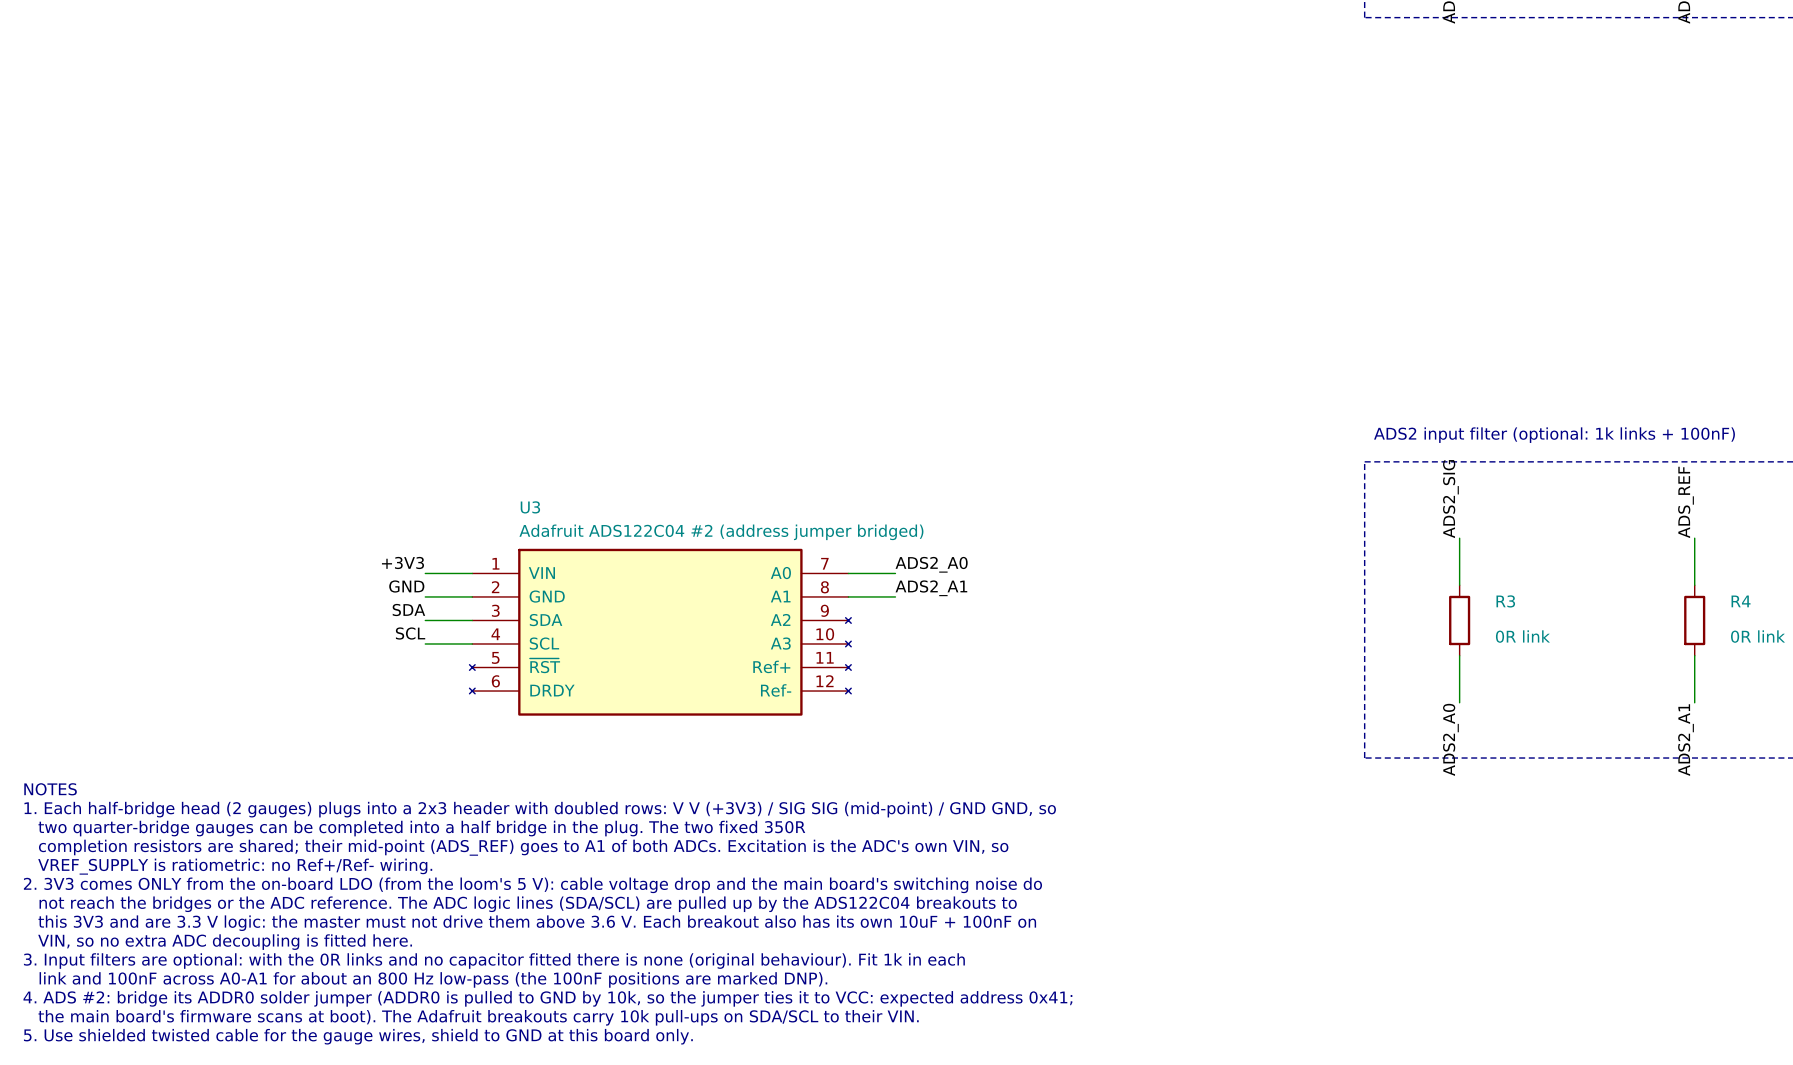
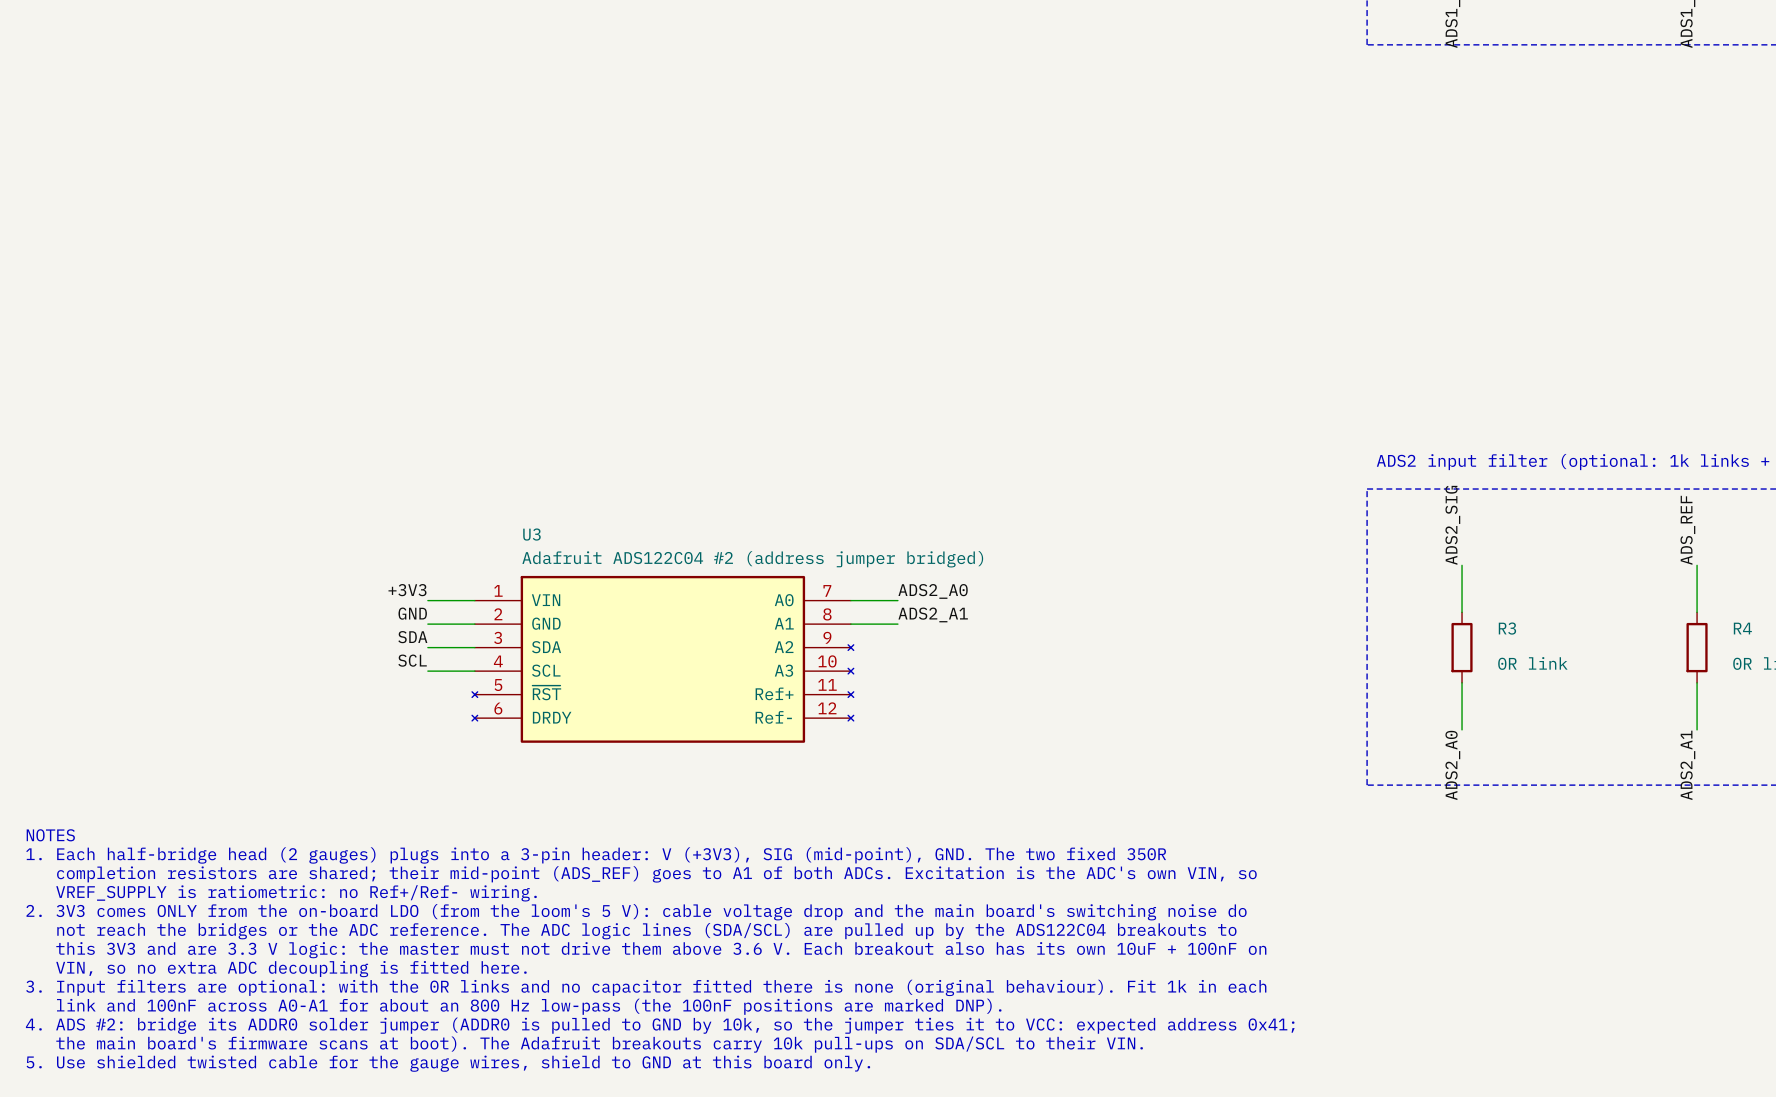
text: NOTES (50, 789) -> none
text: 1. Each half-bridge head (2 gauges) plugs into a 2x3 header with doubled rows: V V (+3V3) / SIG SIG (mid-point) / GND GND, so (540, 809) -> NOTES (50, 835)
text: two quarter-bridge gauges can be completed into a half bridge in the plug. The two fixed 350R (421, 828) -> 1. Each half-bridge head (2 gauges) plugs into a 3-pin header: V (+3V3), SIG (mid-point), GND. The two fixed 350R (596, 855)

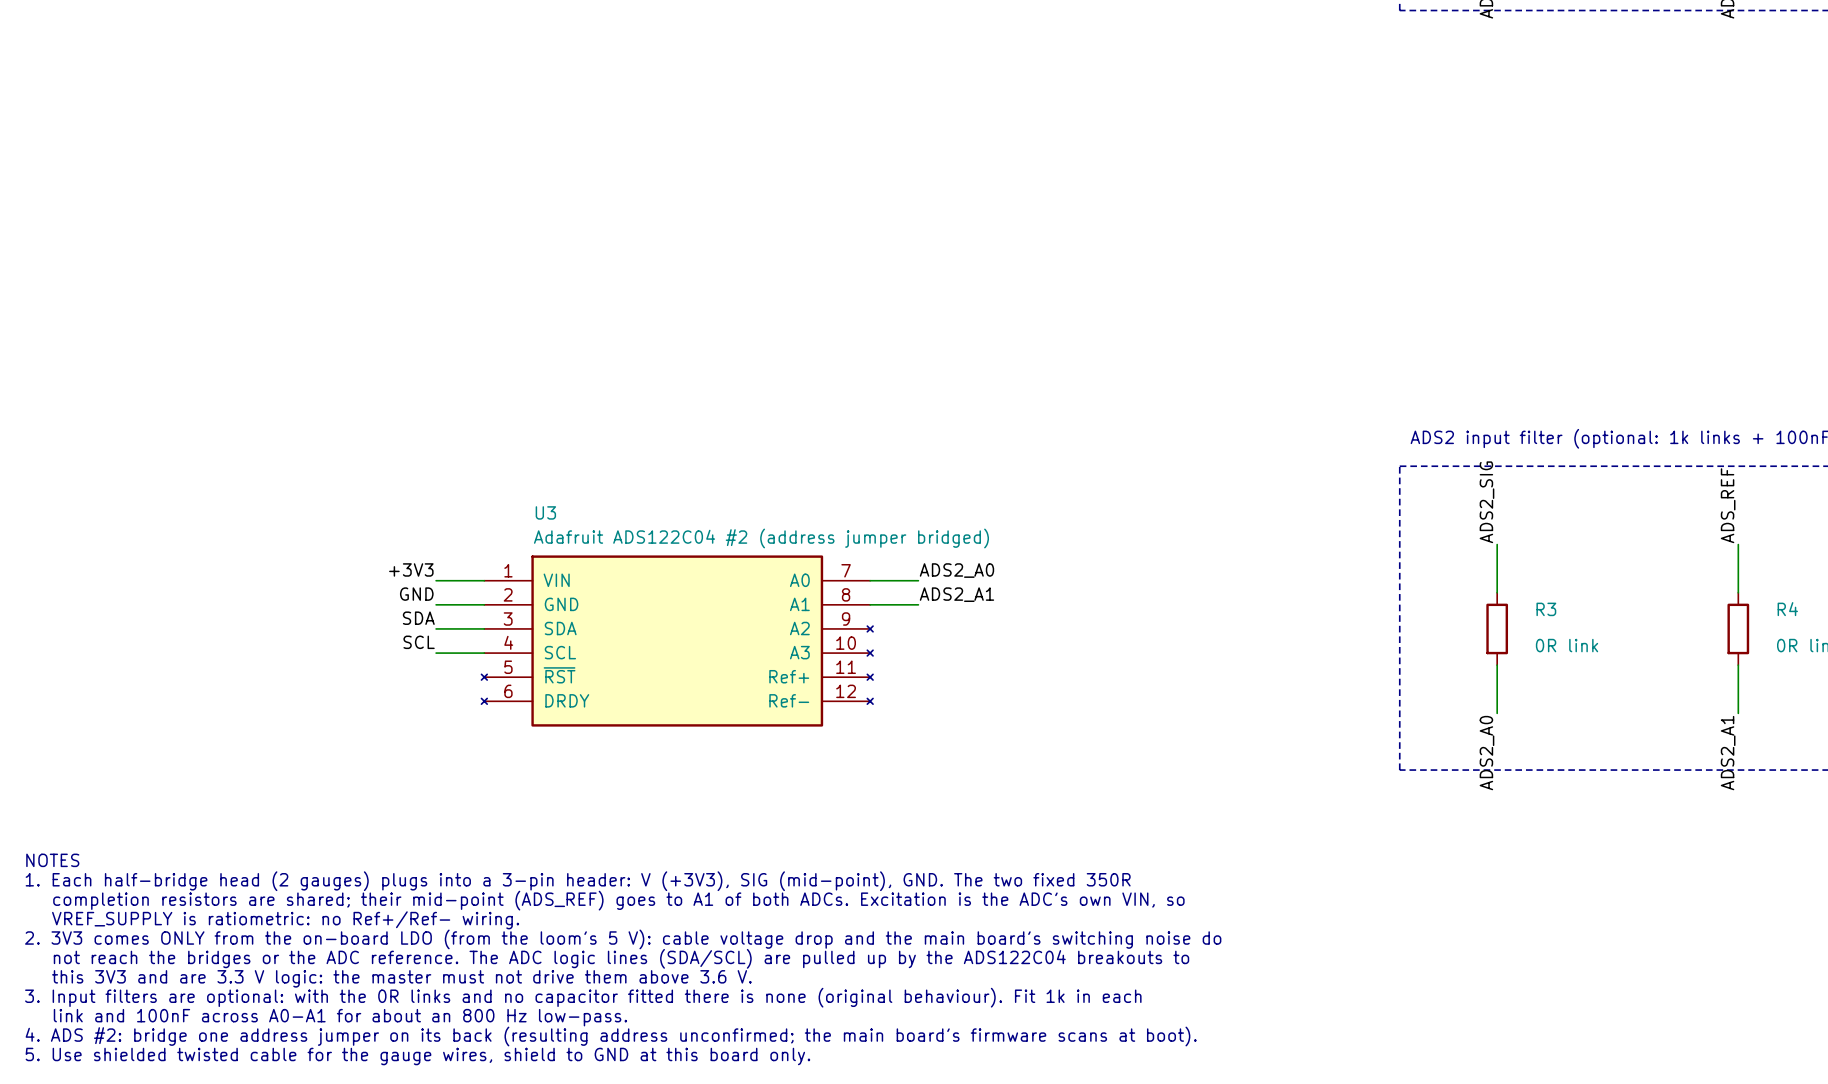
text: NOTES (50, 835) -> none
text: 1. Each half-bridge head (2 gauges) plugs into a 3-pin header: V (+3V3), SIG (mid-point), GND. The two fixed 350R (596, 855) -> none
text: completion resistors are shared; their mid-point (ADS_REF) goes to A1 of both ADCs. Excitation is the ADC's own VIN, so (656, 874) -> NOTES (52, 860)
text: VREF_SUPPLY is ratiometric: no Ref+/Ref- wiring. (296, 893) -> 1. Each half-bridge head (2 gauges) plugs into a 3-pin header: V (+3V3), SIG (mid-point), GND. The two fixed 350R (578, 881)
text: 2. 3V3 comes ONLY from the on-board LDO (from the loom's 5 V): cable voltage drop and the main board's switching noise do (636, 912) -> completion resistors are shared; their mid-point (ADS_REF) goes to A1 of both ADCs. Excitation is the ADC's own VIN, so (618, 900)
text: not reach the bridges or the ADC reference. The ADC logic lines (SDA/SCL) are pulled up by the ADS122C04 breakouts to (646, 931) -> VREF_SUPPLY is ratiometric: no Ref+/Ref- wiring. (285, 920)
text: this 3V3 and are 3.3 V logic: the master must not drive them above 3.6 V. Each breakout also has its own 10uF + 100nF on (661, 950) -> 2. 3V3 comes ONLY from the on-board LDO (from the loom's 5 V): cable voltage drop and the main board's switching noise do (623, 939)
text: VIN, so no extra ADC decoupling is fitted here. (291, 969) -> not reach the bridges or the ADC reference. The ADC logic lines (SDA/SCL) are pulled up by the ADS122C04 breakouts to (621, 958)
text: 3. Input filters are optional: with the 0R links and no capacitor fitted there is none (original behaviour). Fit 1k in each (646, 987) -> this 3V3 and are 3.3 V logic: the master must not drive them above 3.6 V. (401, 978)
text: link and 100nF across A0-A1 for about an 800 Hz low-pass (the 100nF positions are marked DNP). (529, 1006) -> 3. Input filters are optional: with the 0R links and no capacitor fitted there is none (original behaviour). Fit 1k in each (583, 997)
text: 4. ADS #2: bridge its ADDR0 solder jumper (ADDR0 is pulled to GND by 10k, so the jumper ties it to VCC: expected address 0x41; (660, 1025) -> link and 100nF across A0-A1 for about an 800 Hz low-pass. (340, 1017)
text: the main board's firmware scans at boot). The Adafruit breakouts carry 10k pull-ups on SDA/SCL to their VIN. (599, 1044) -> 4. ADS #2: bridge one address jumper on its back (resulting address unconfirmed; the main board's firmware scans at boot). (611, 1036)

